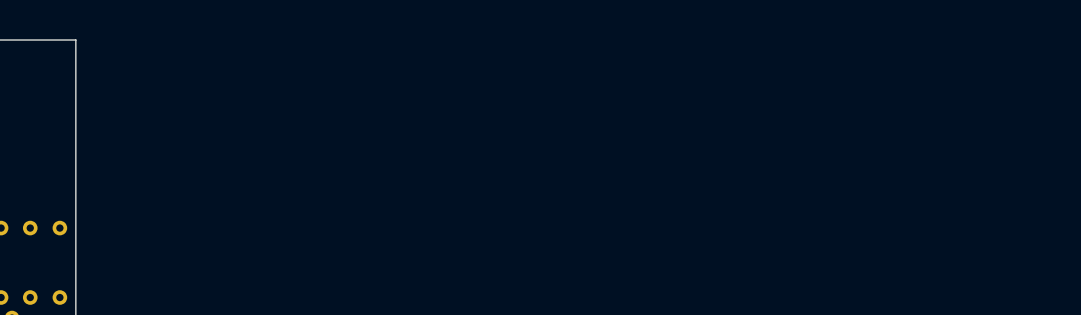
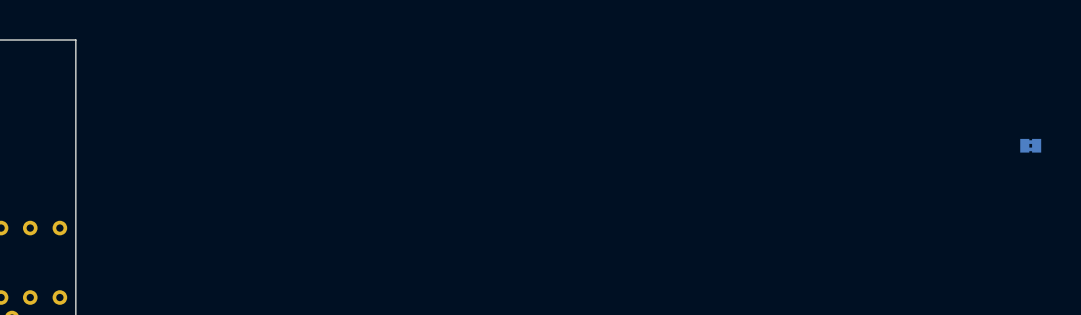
part: none -> (1030, 145)

